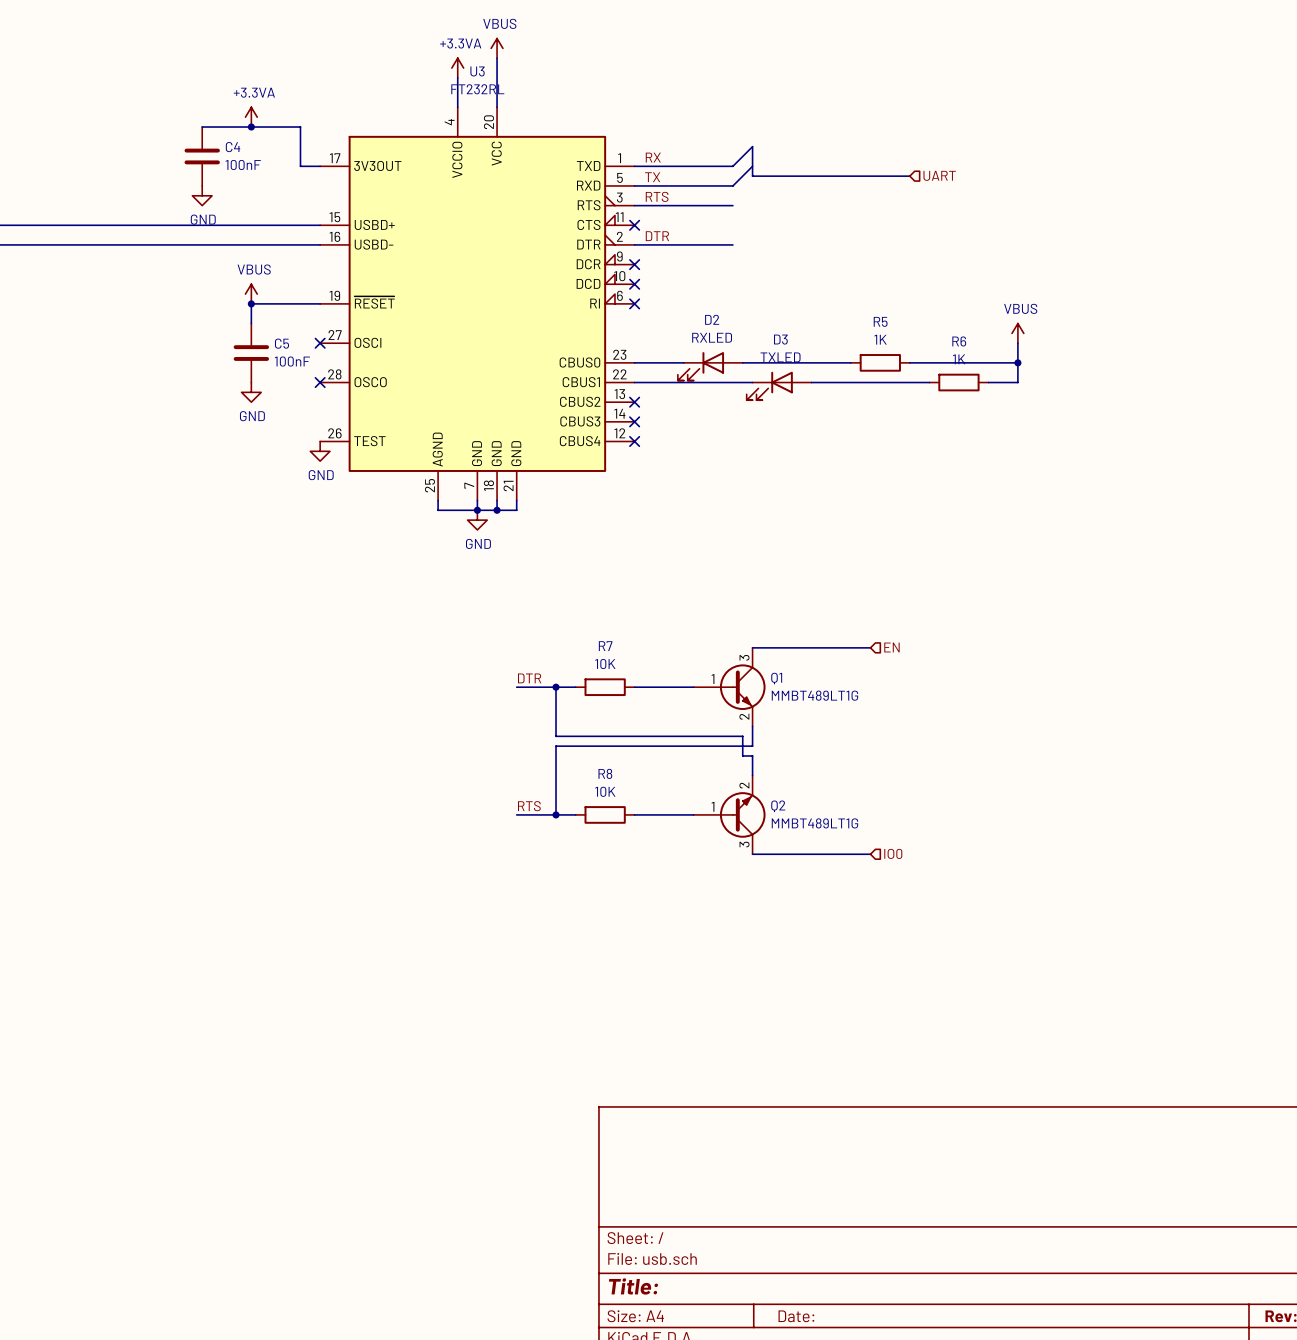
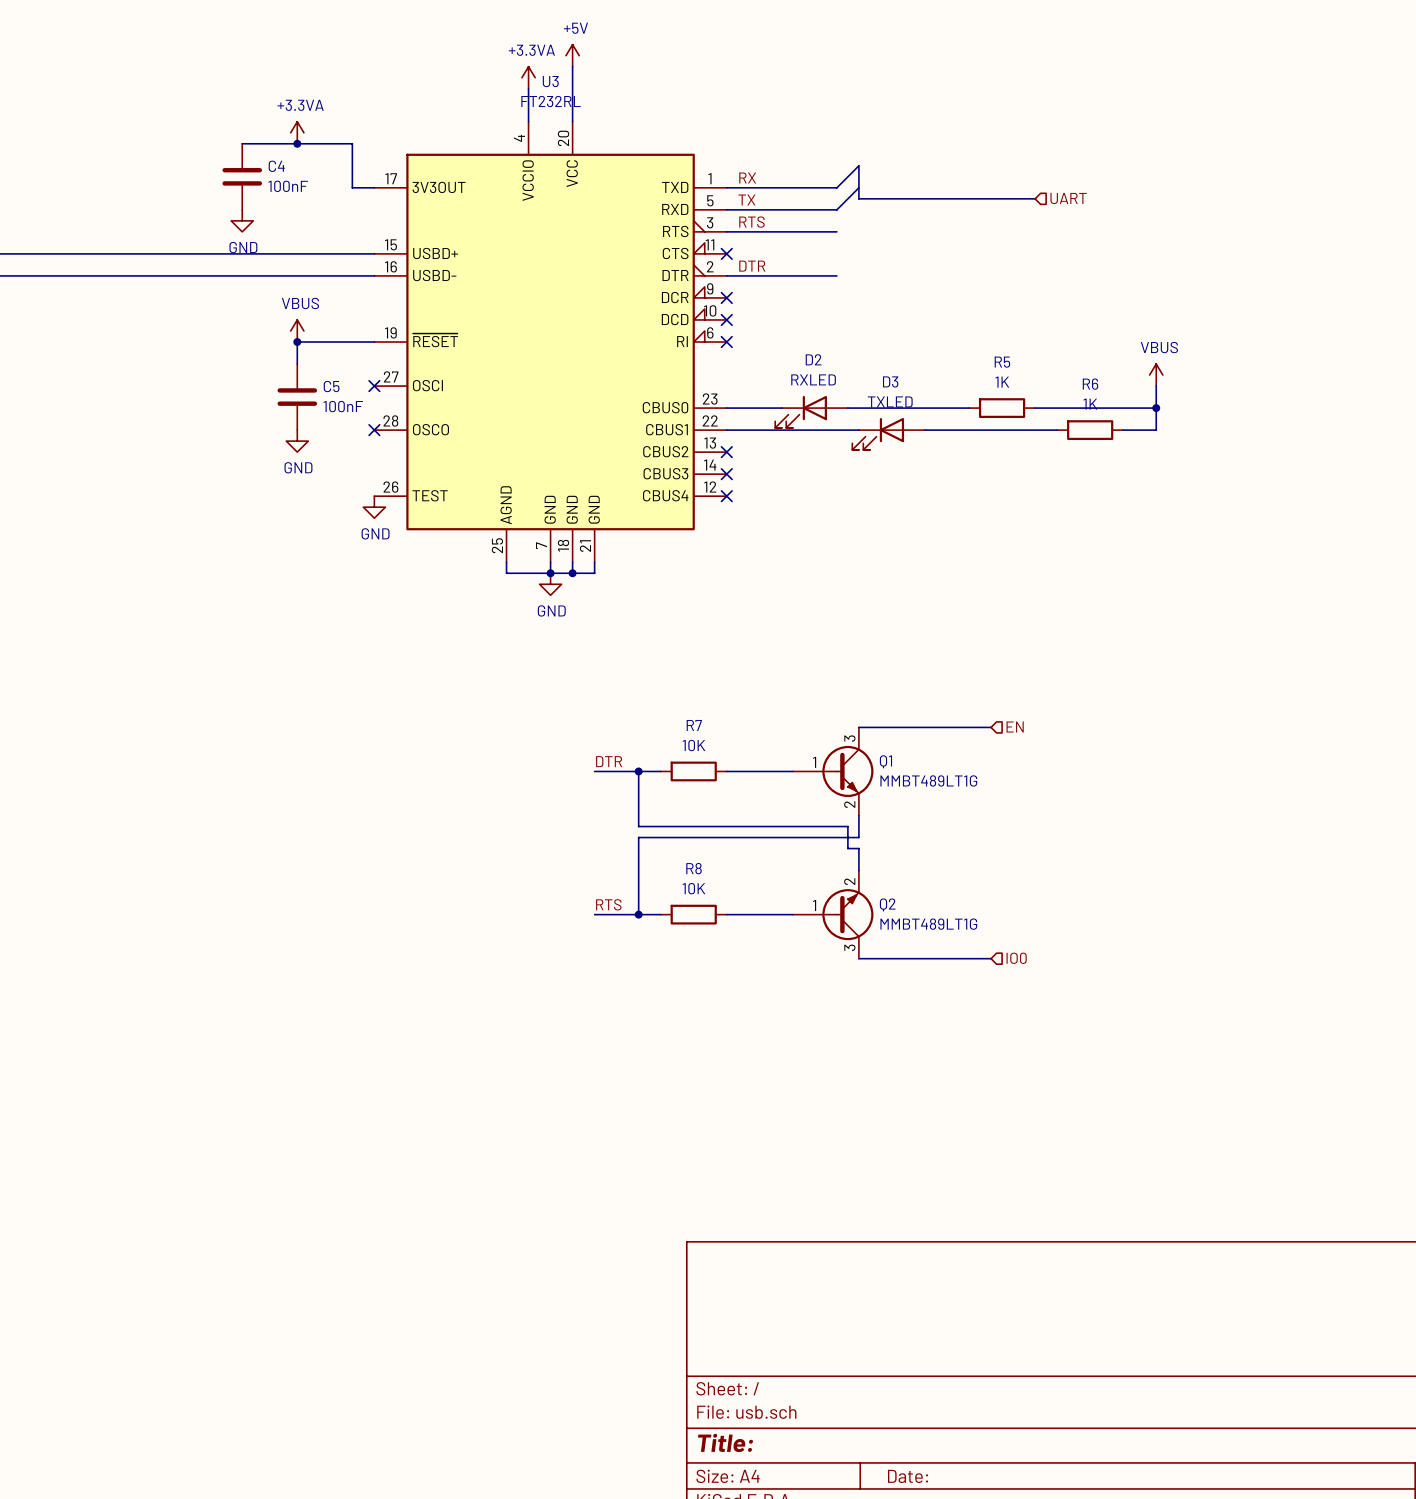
power symbol: VBUS (497, 48) -> +5V (572, 55)

